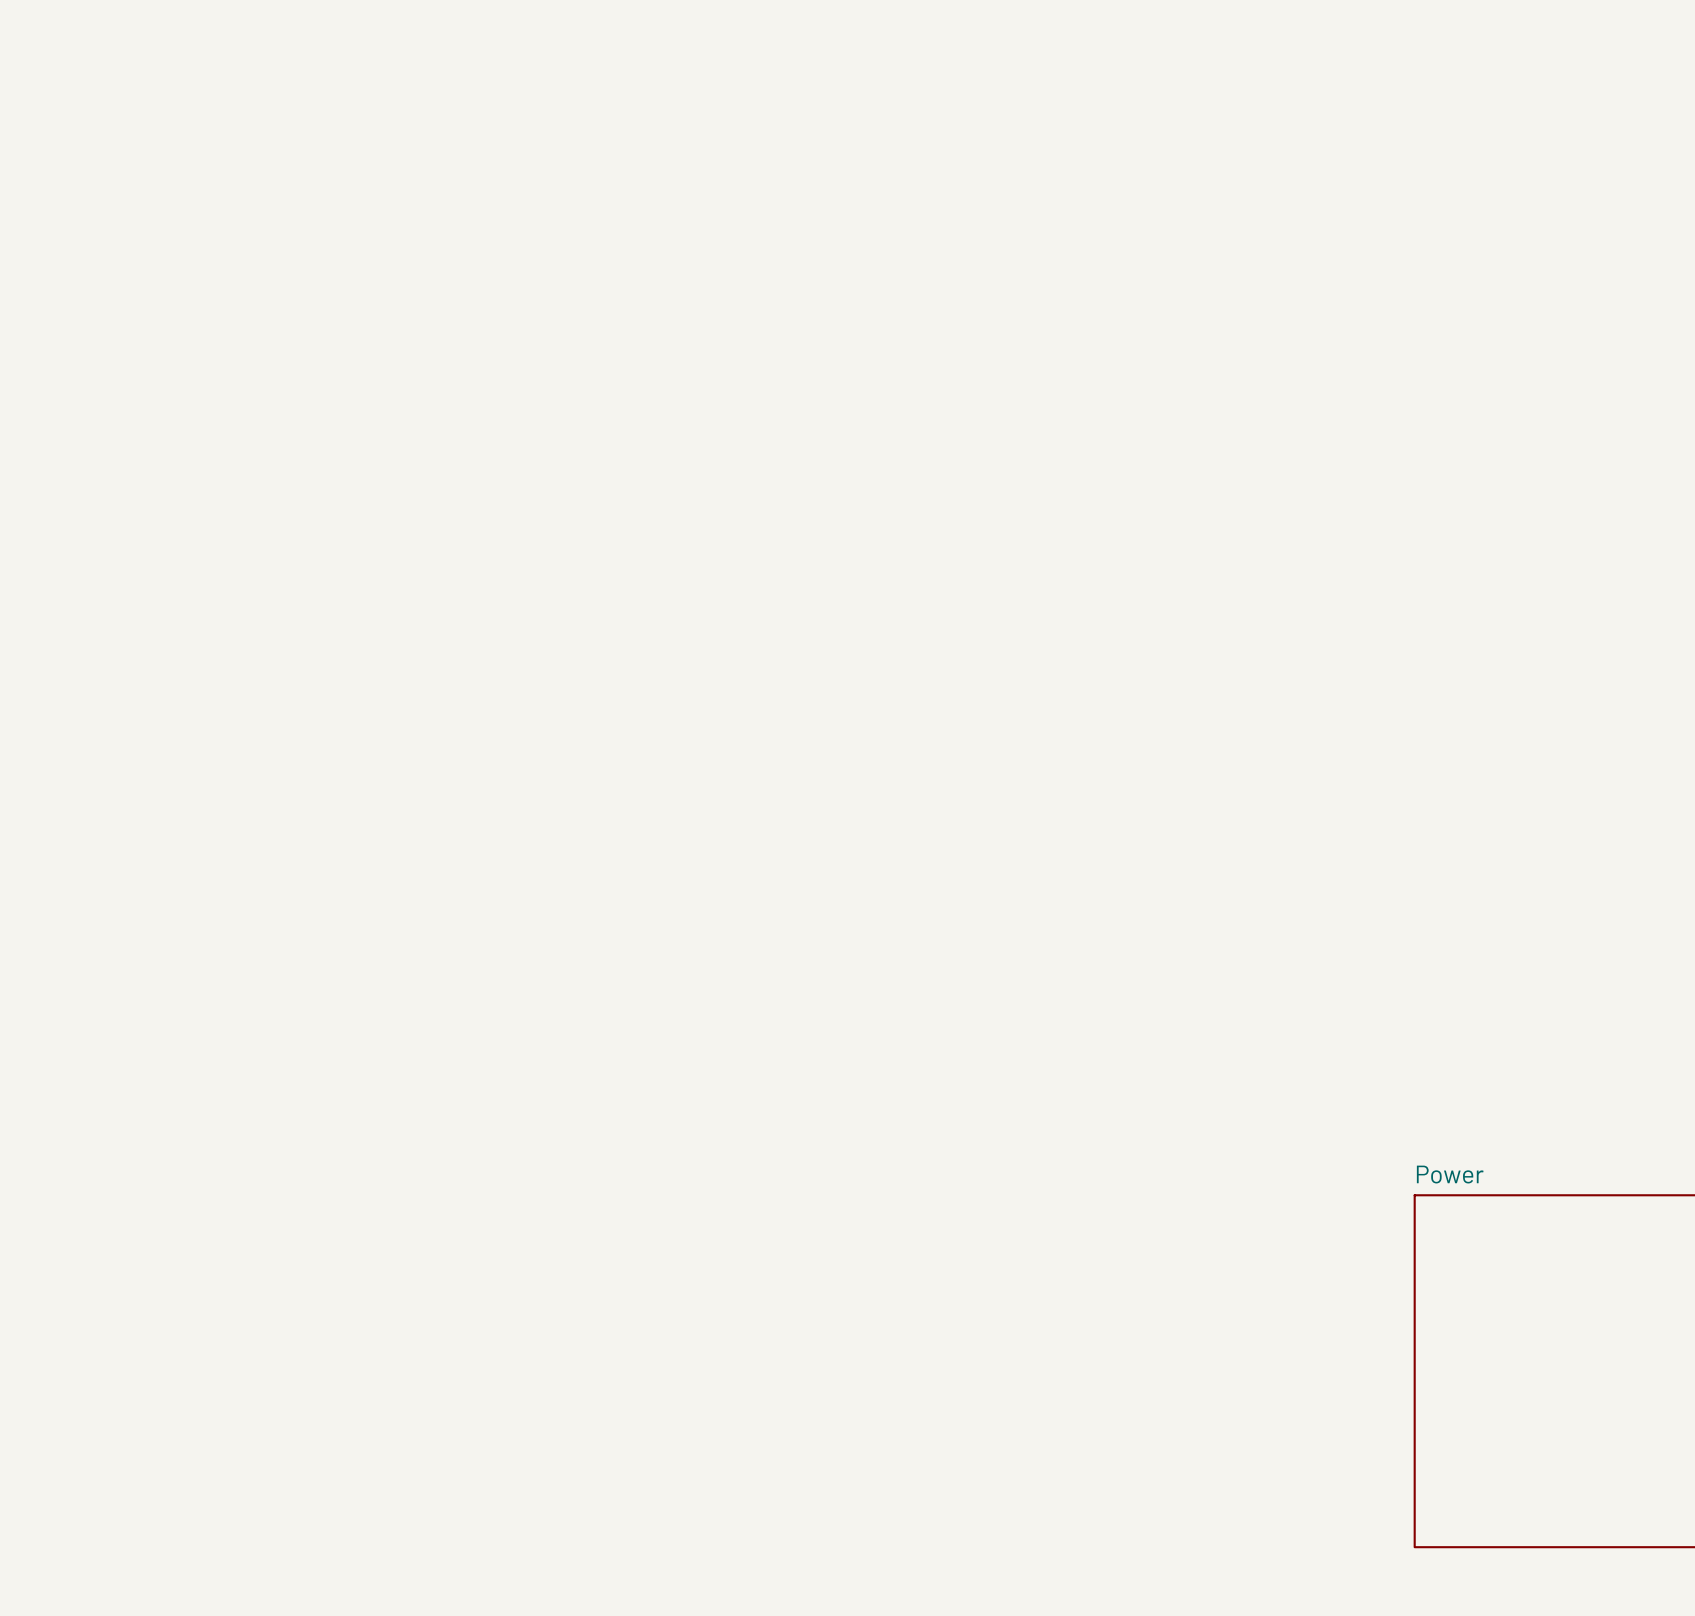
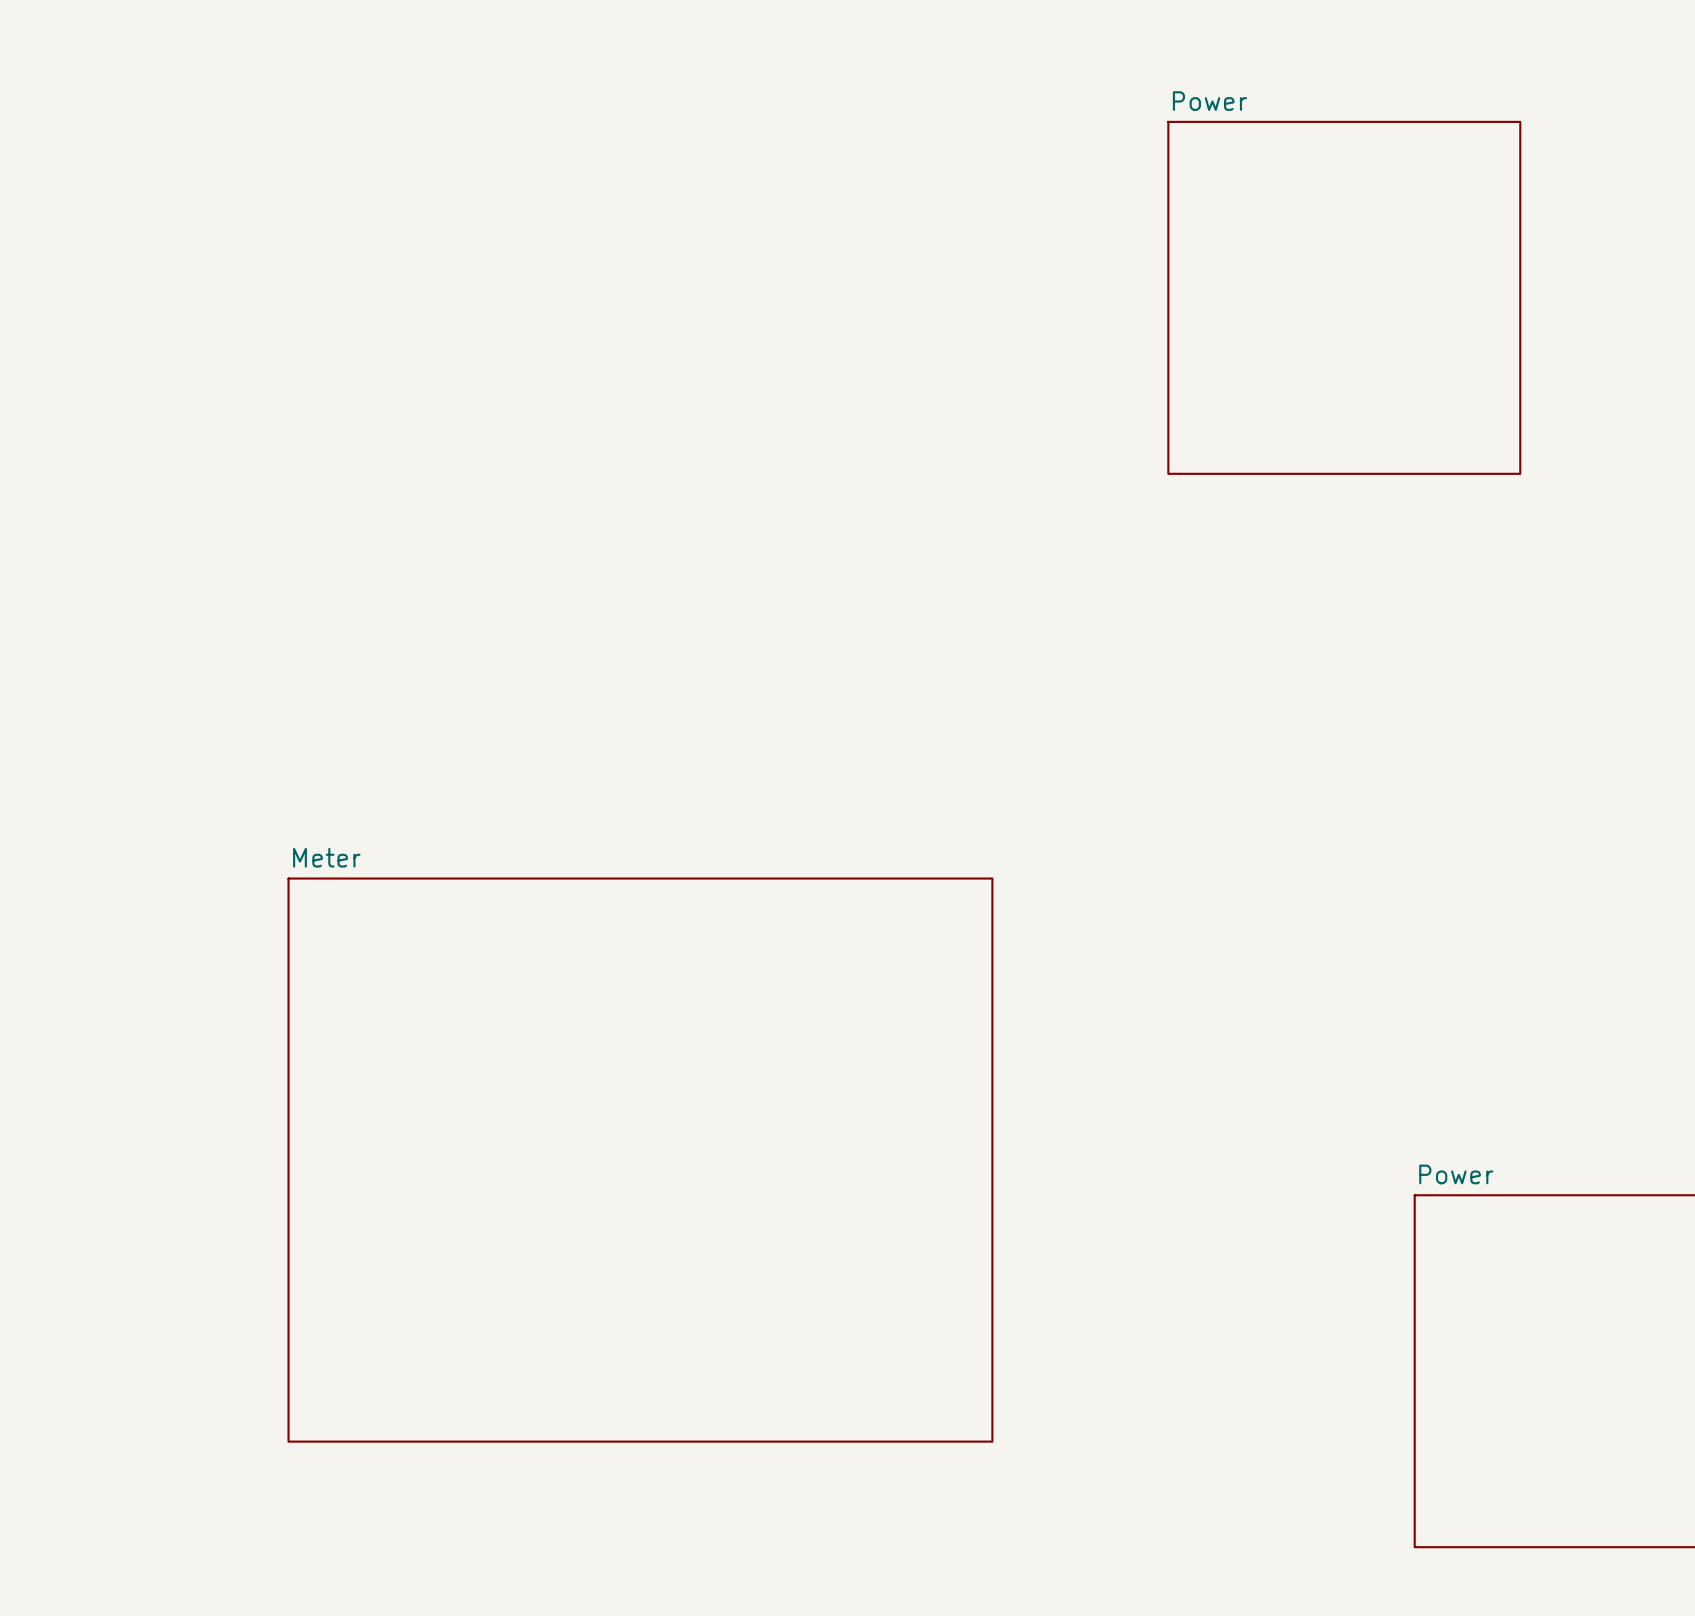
sheet Power: none -> (1344, 297)
sheet Meter: none -> (640, 1160)

